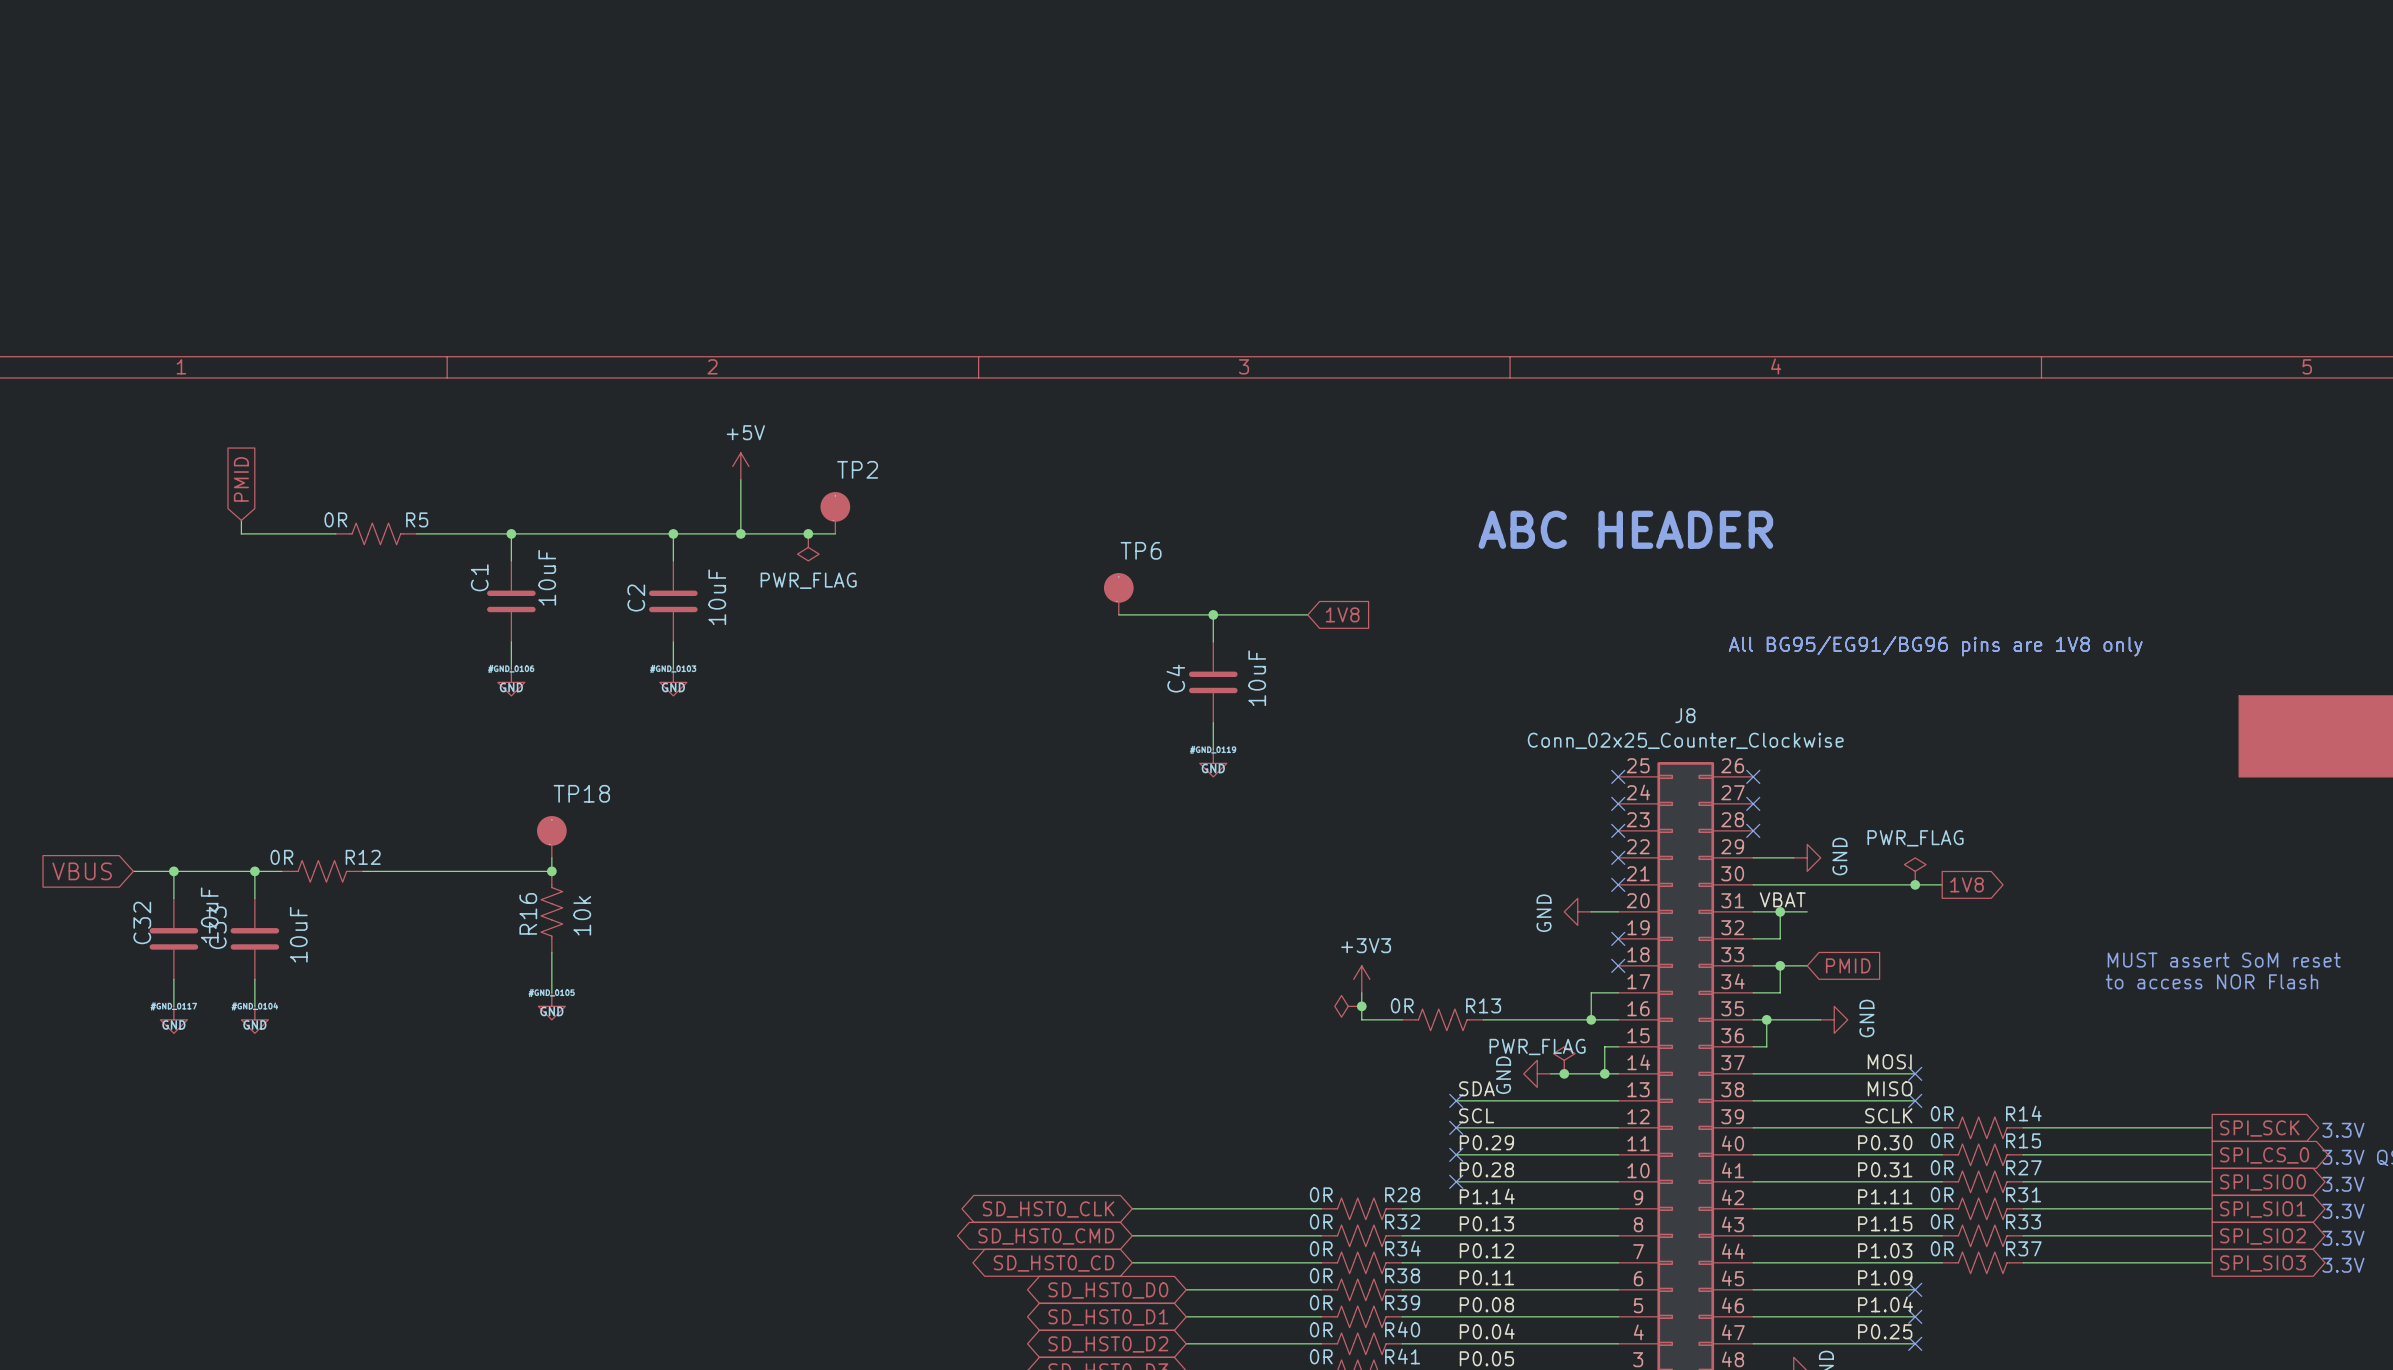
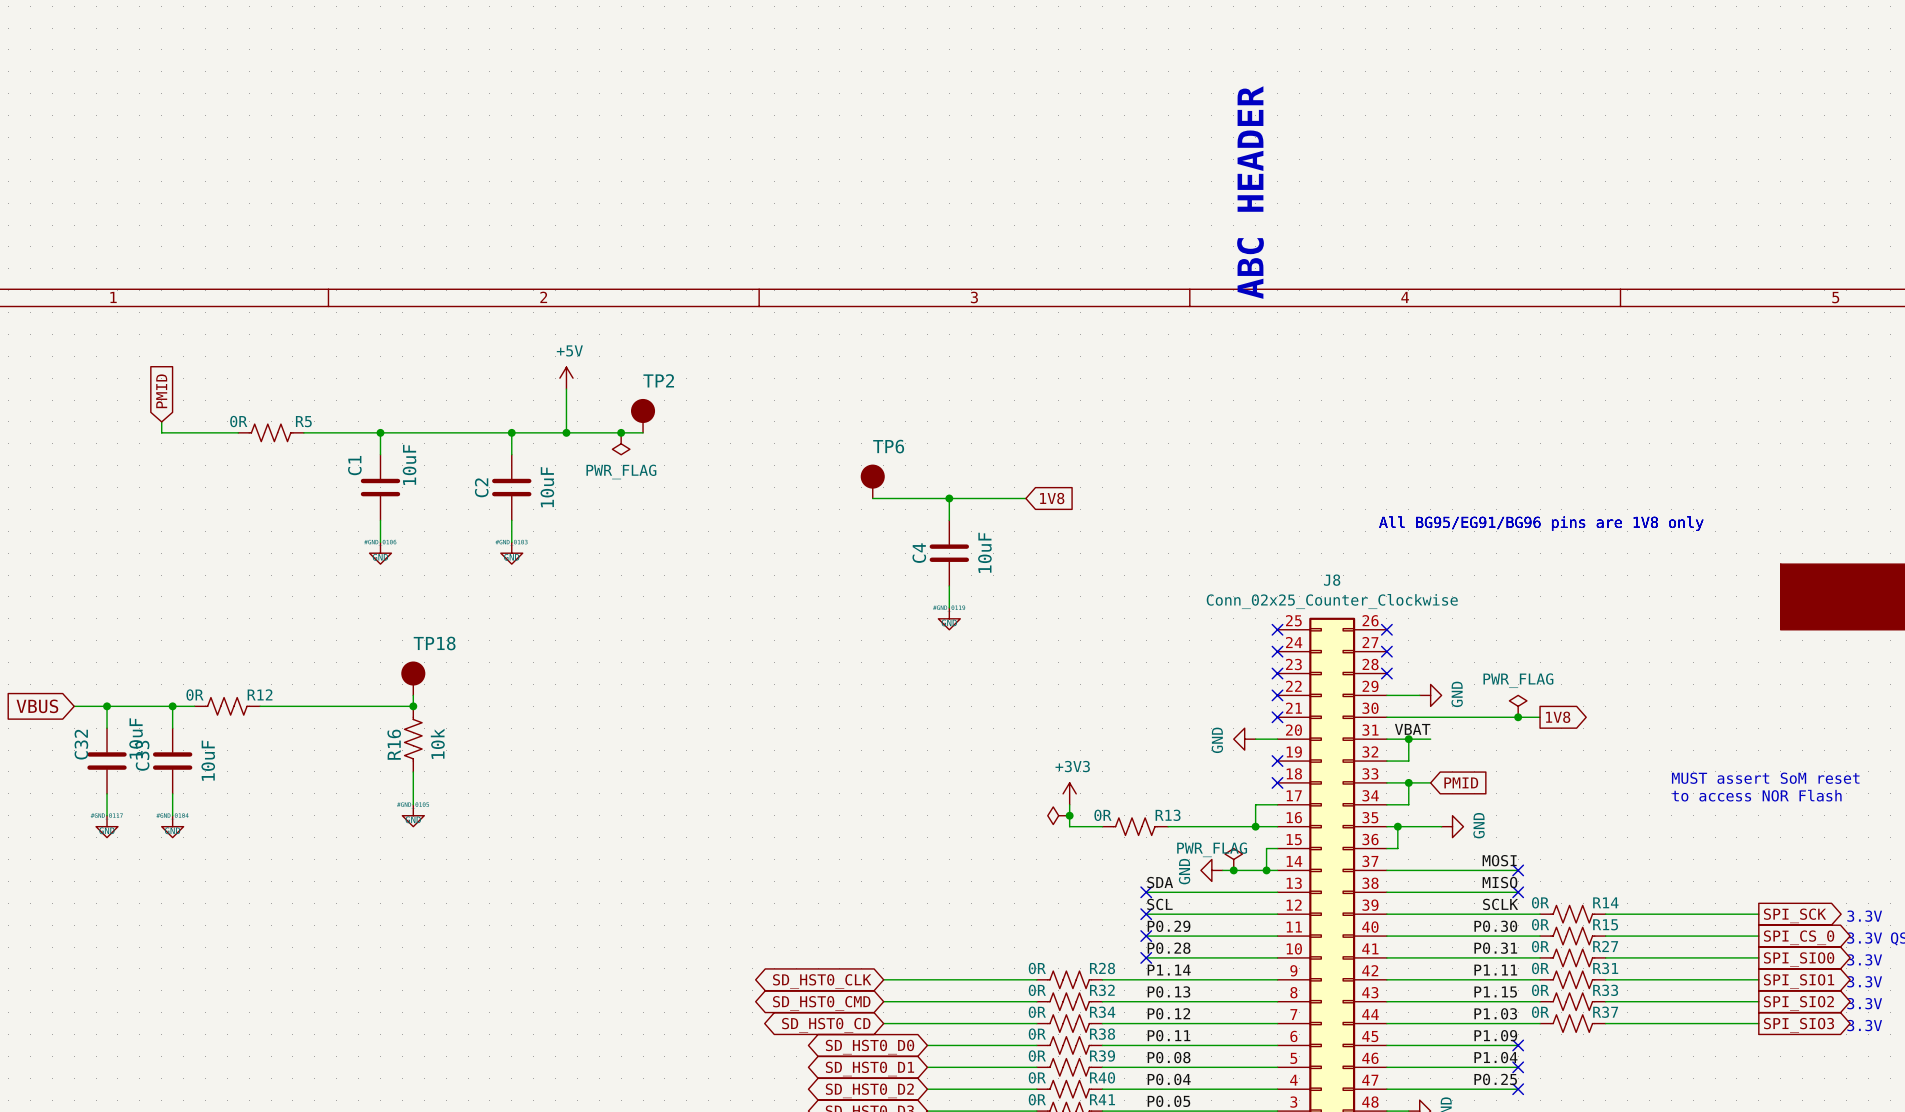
text rotation: 0° (1625, 529) -> 90° counterclockwise (1250, 192)

